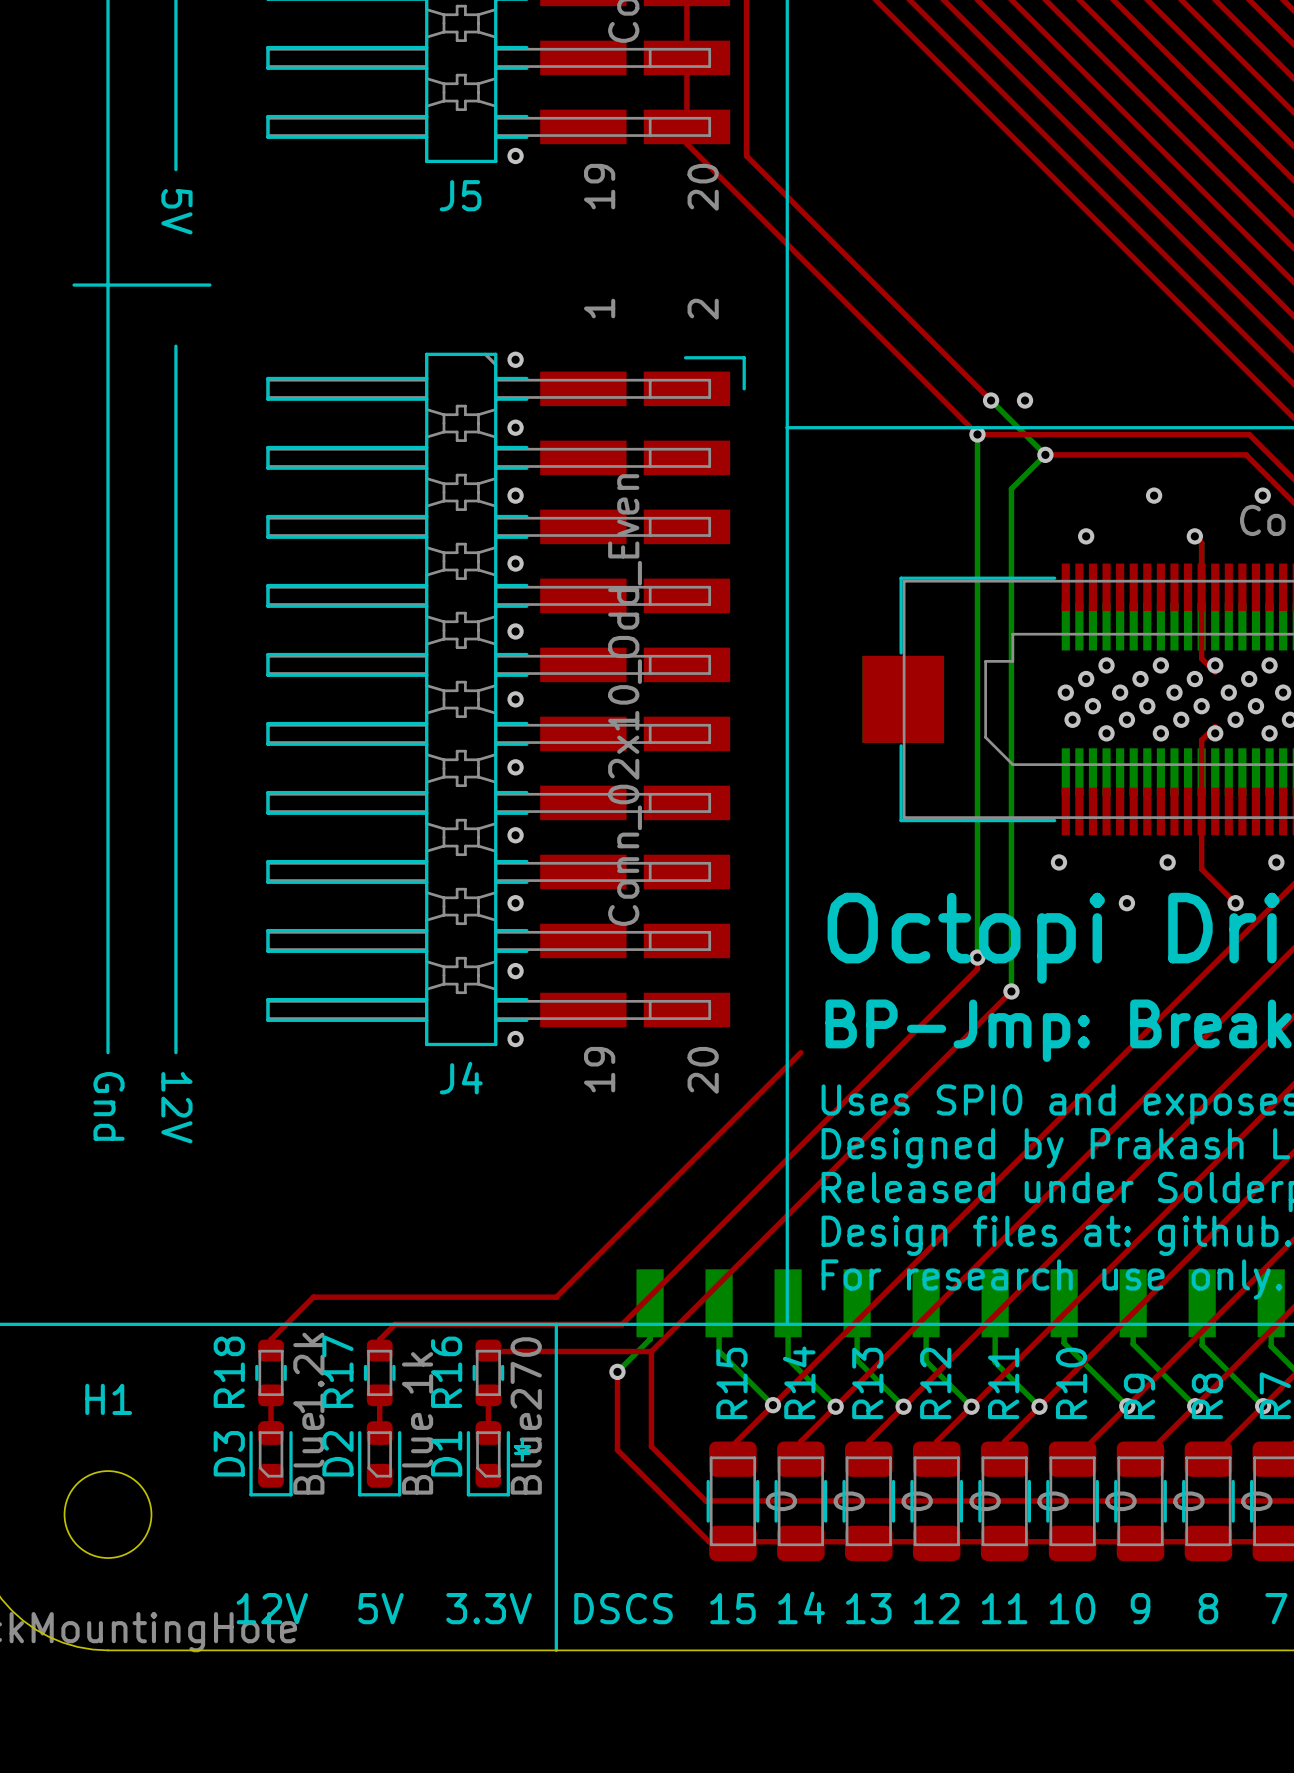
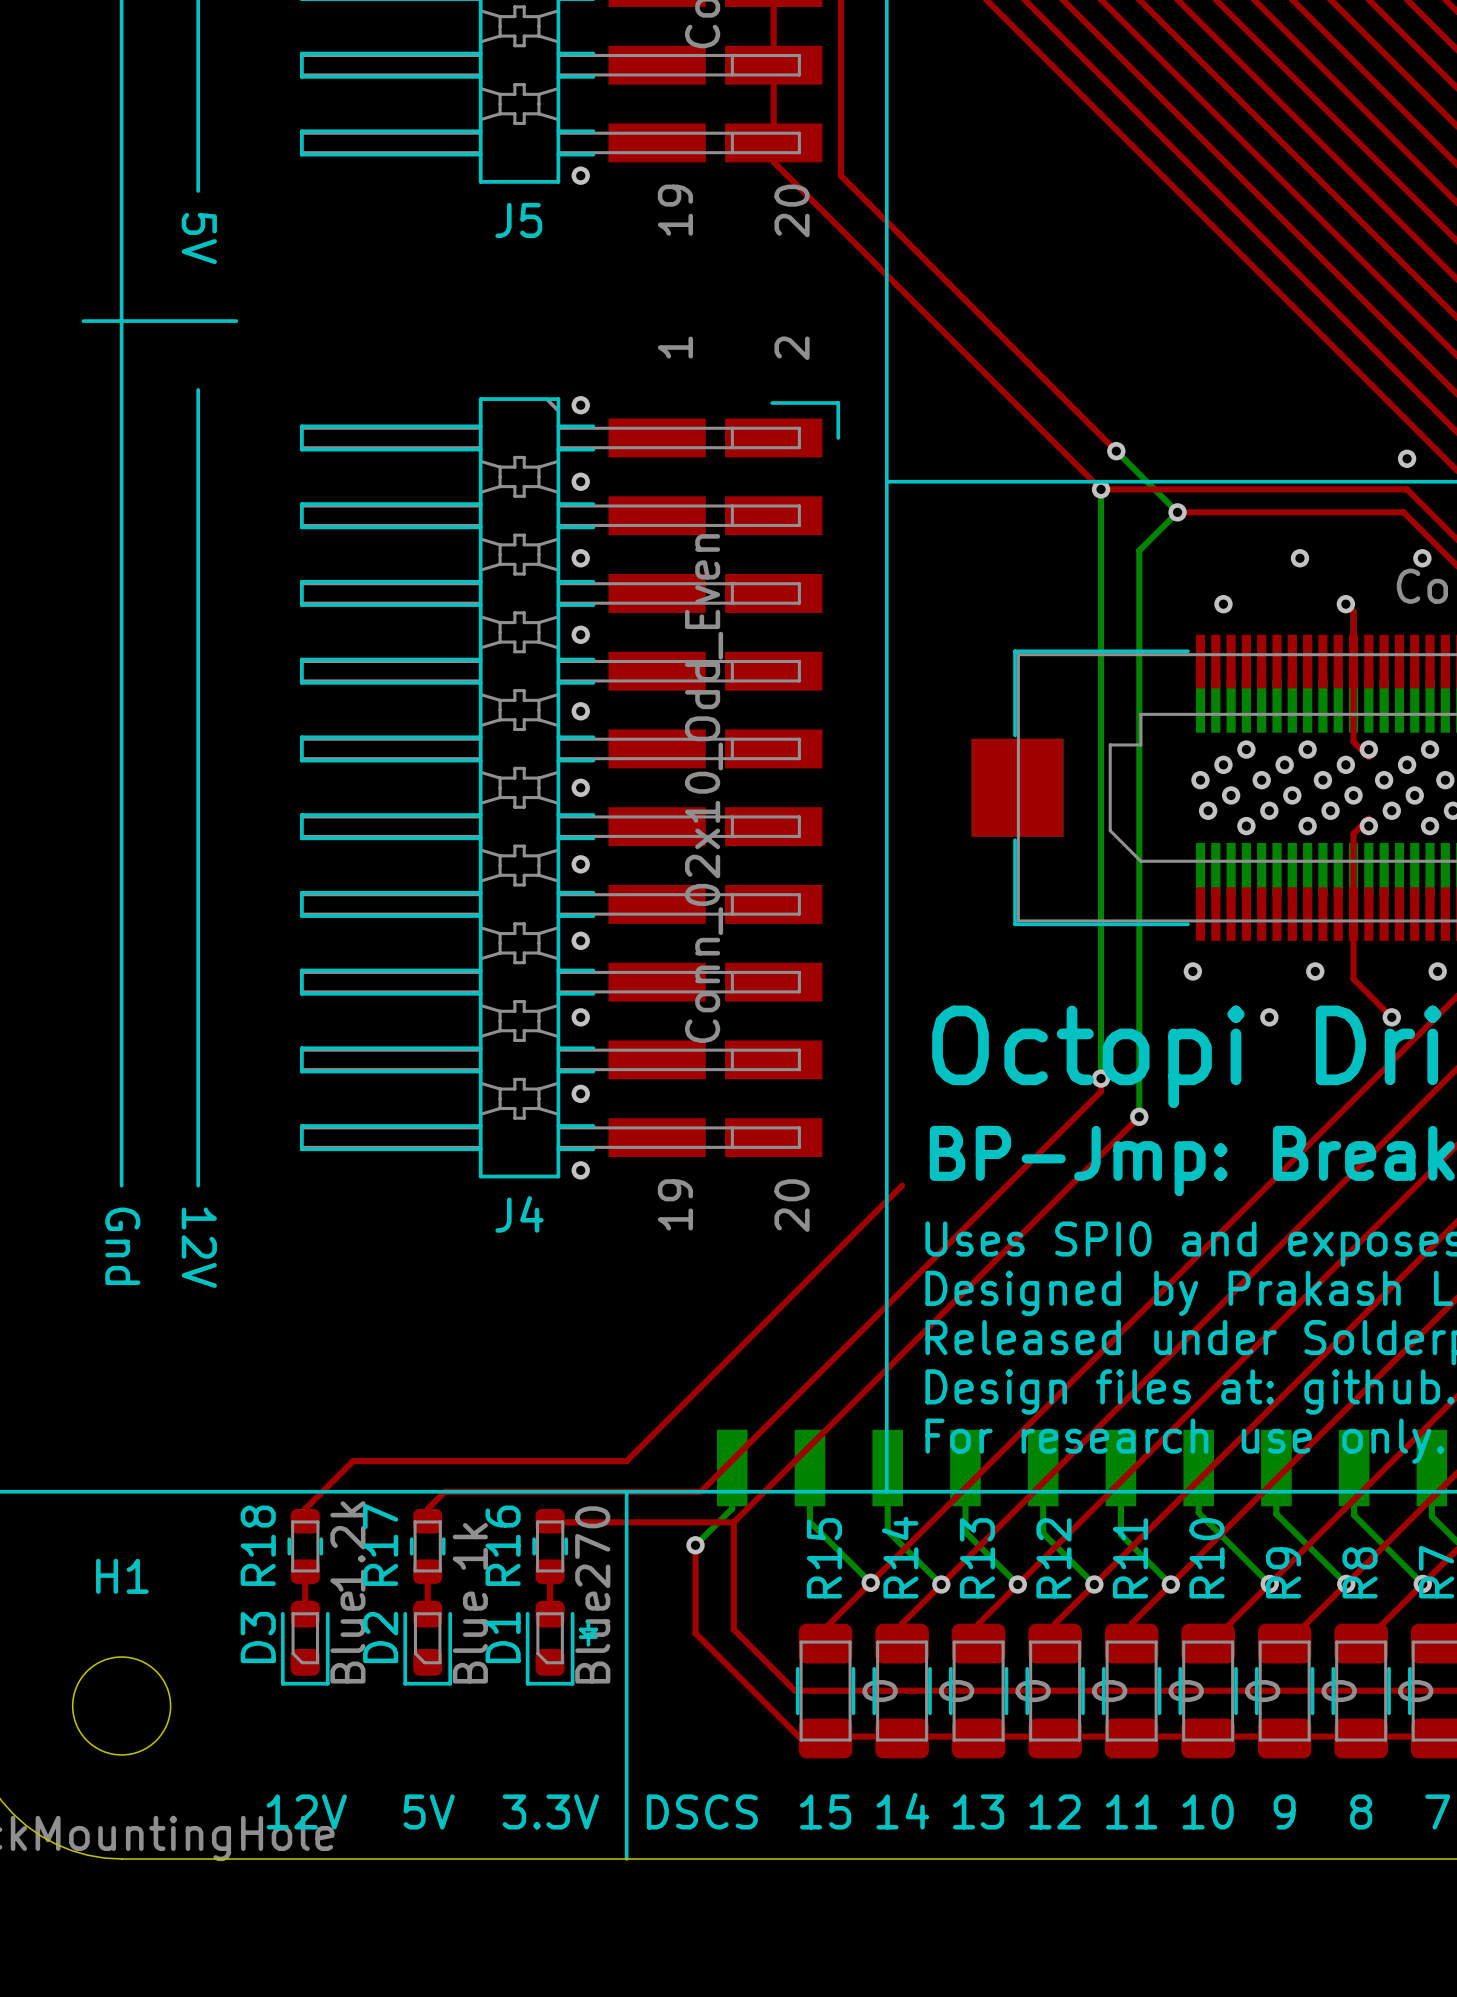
via: (1025, 400) -> none
via: none -> (1407, 458)

